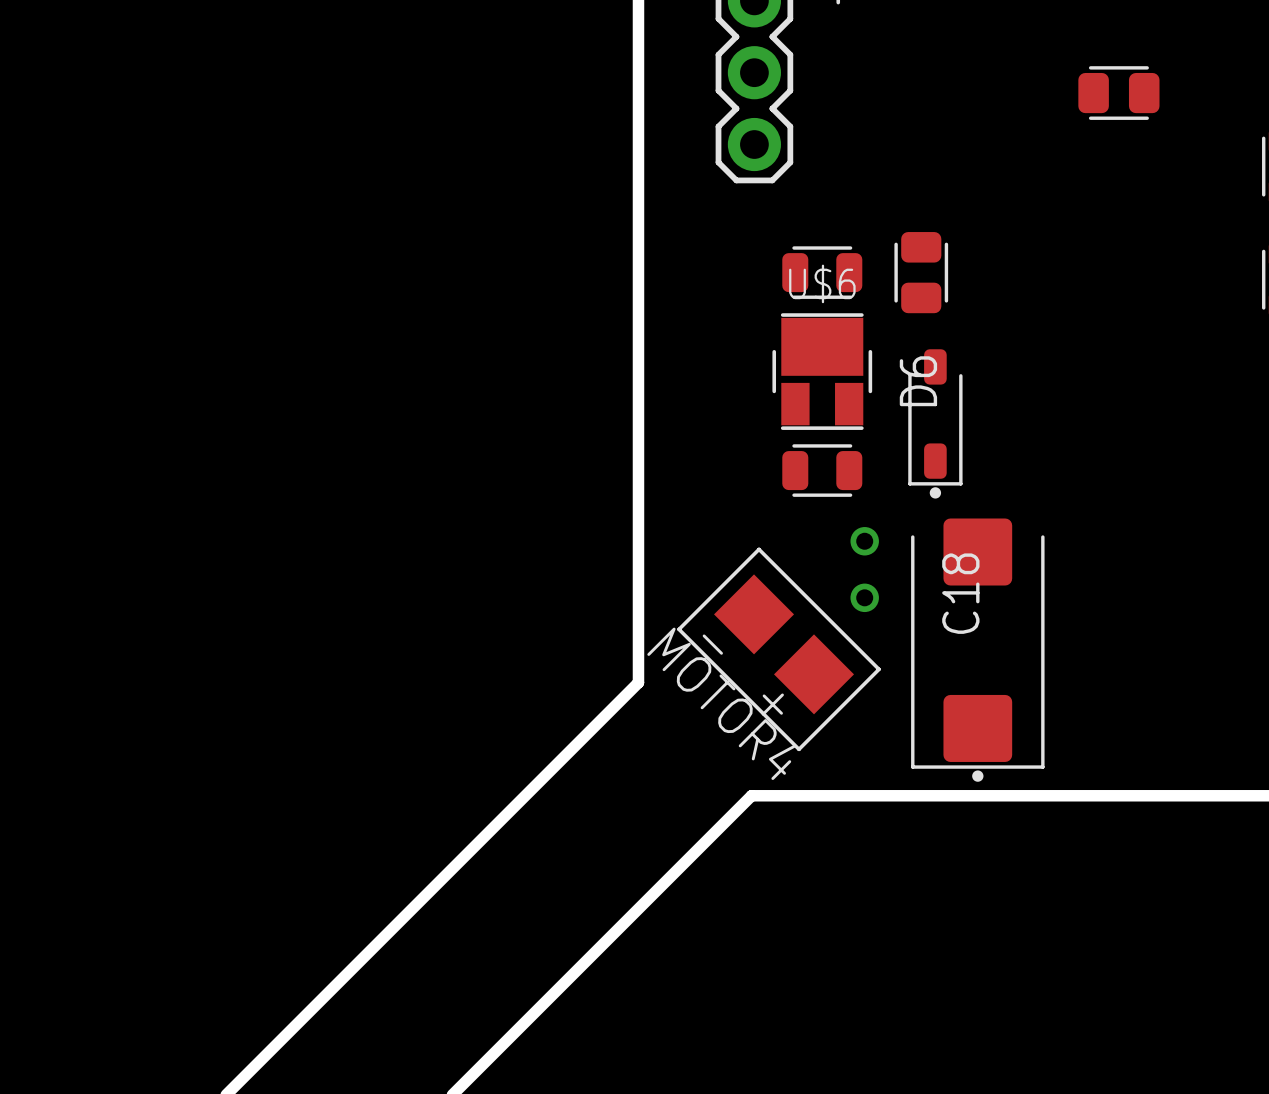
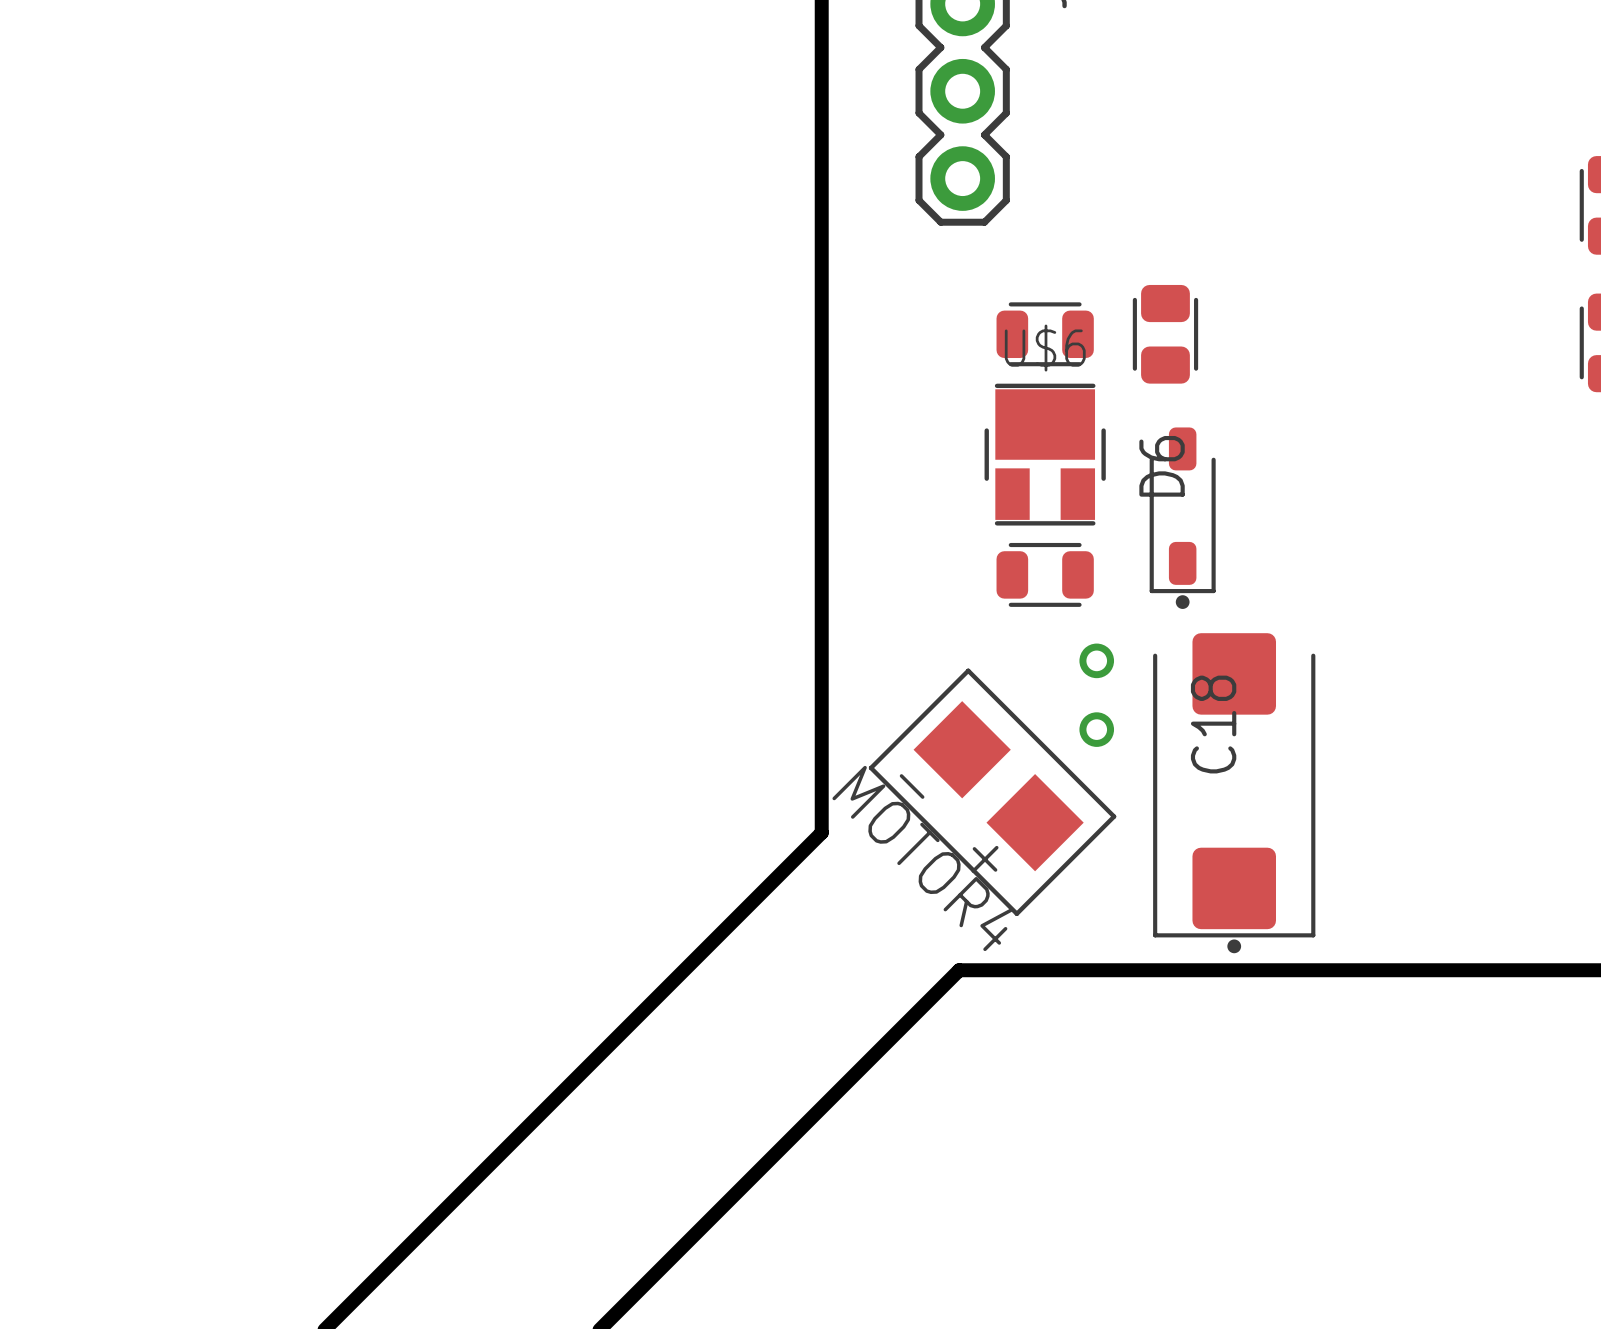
part: (1118, 93) -> none

